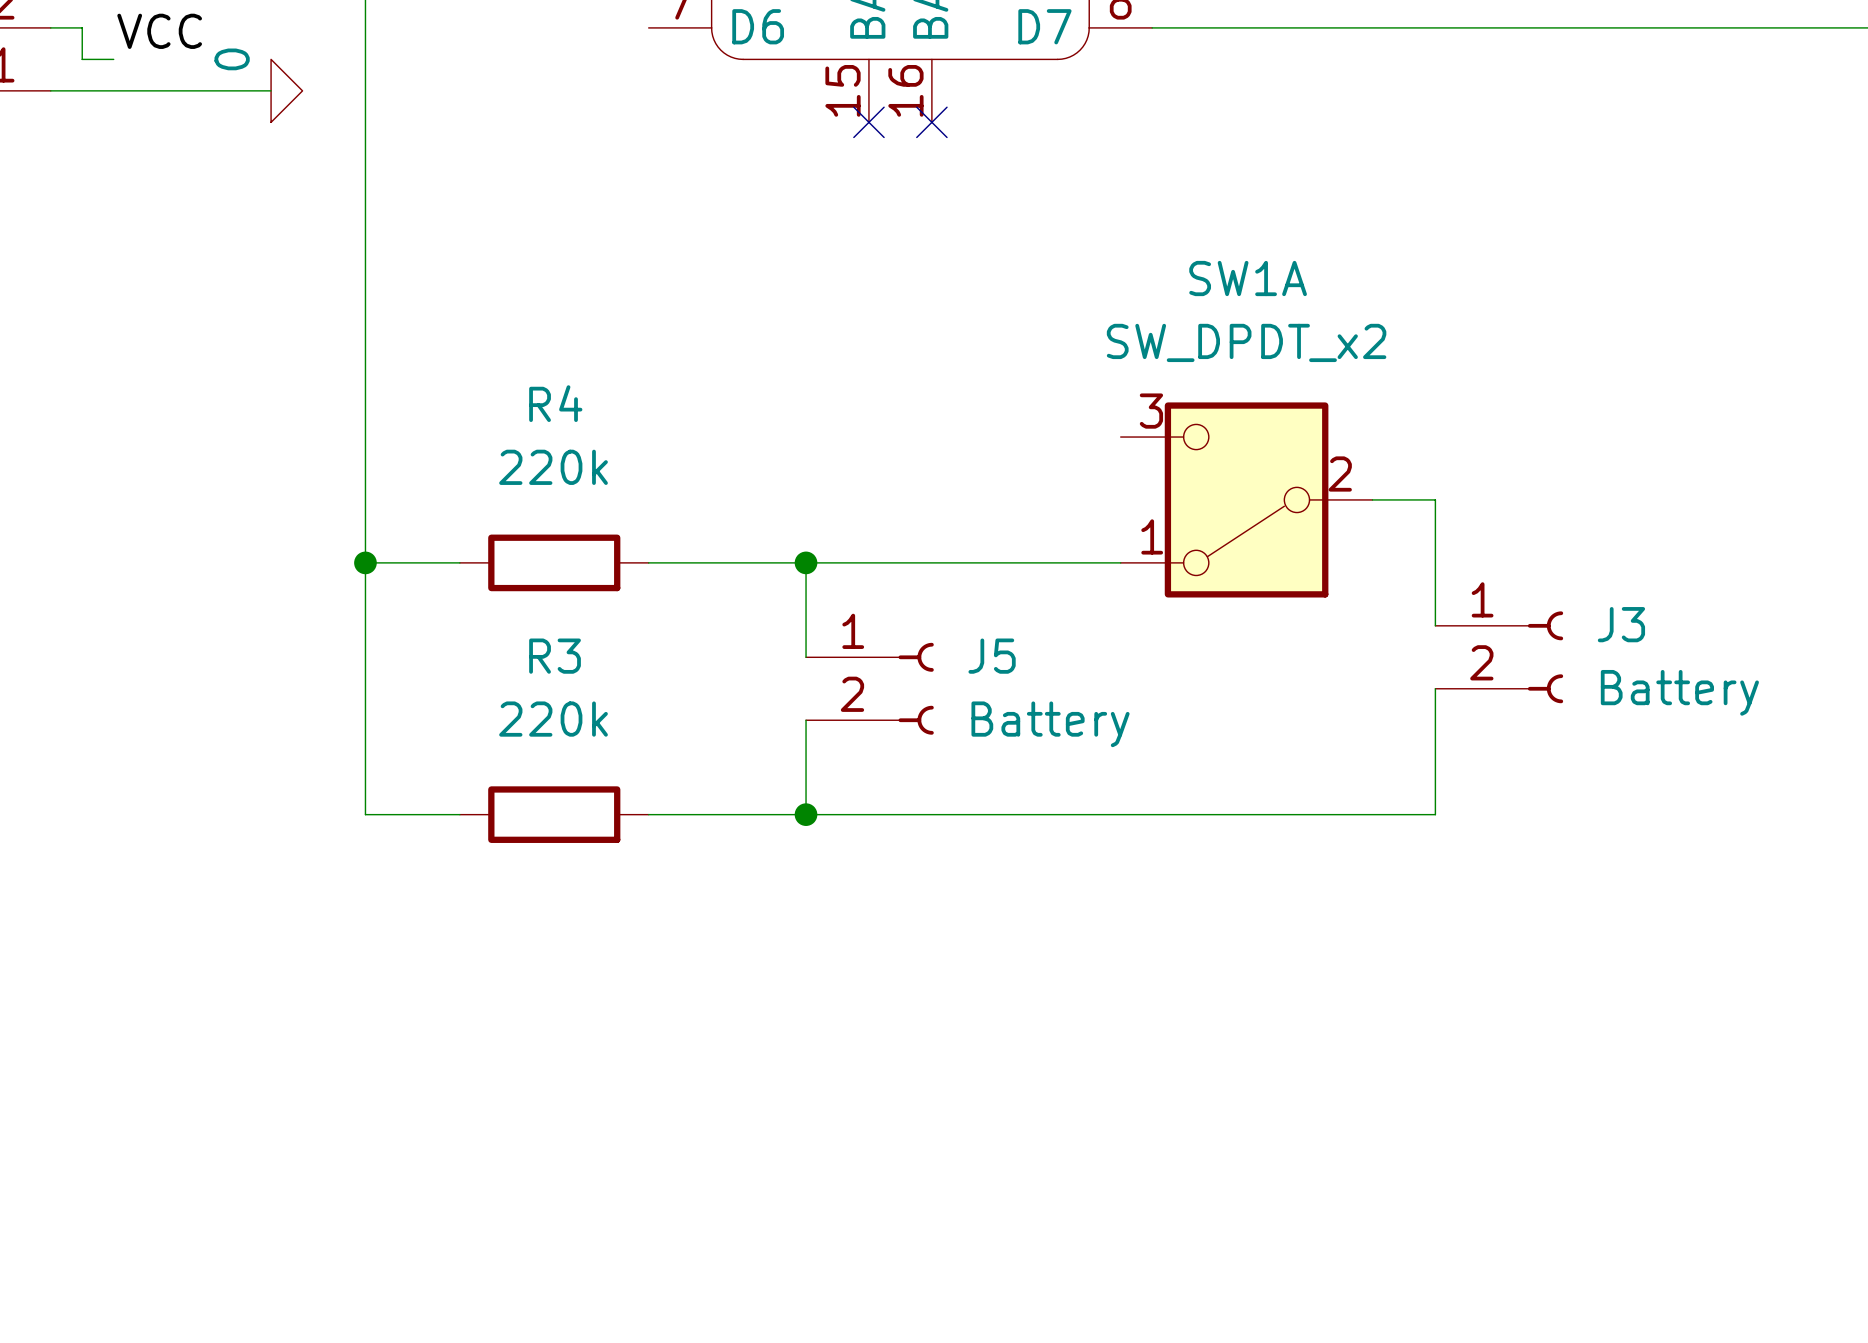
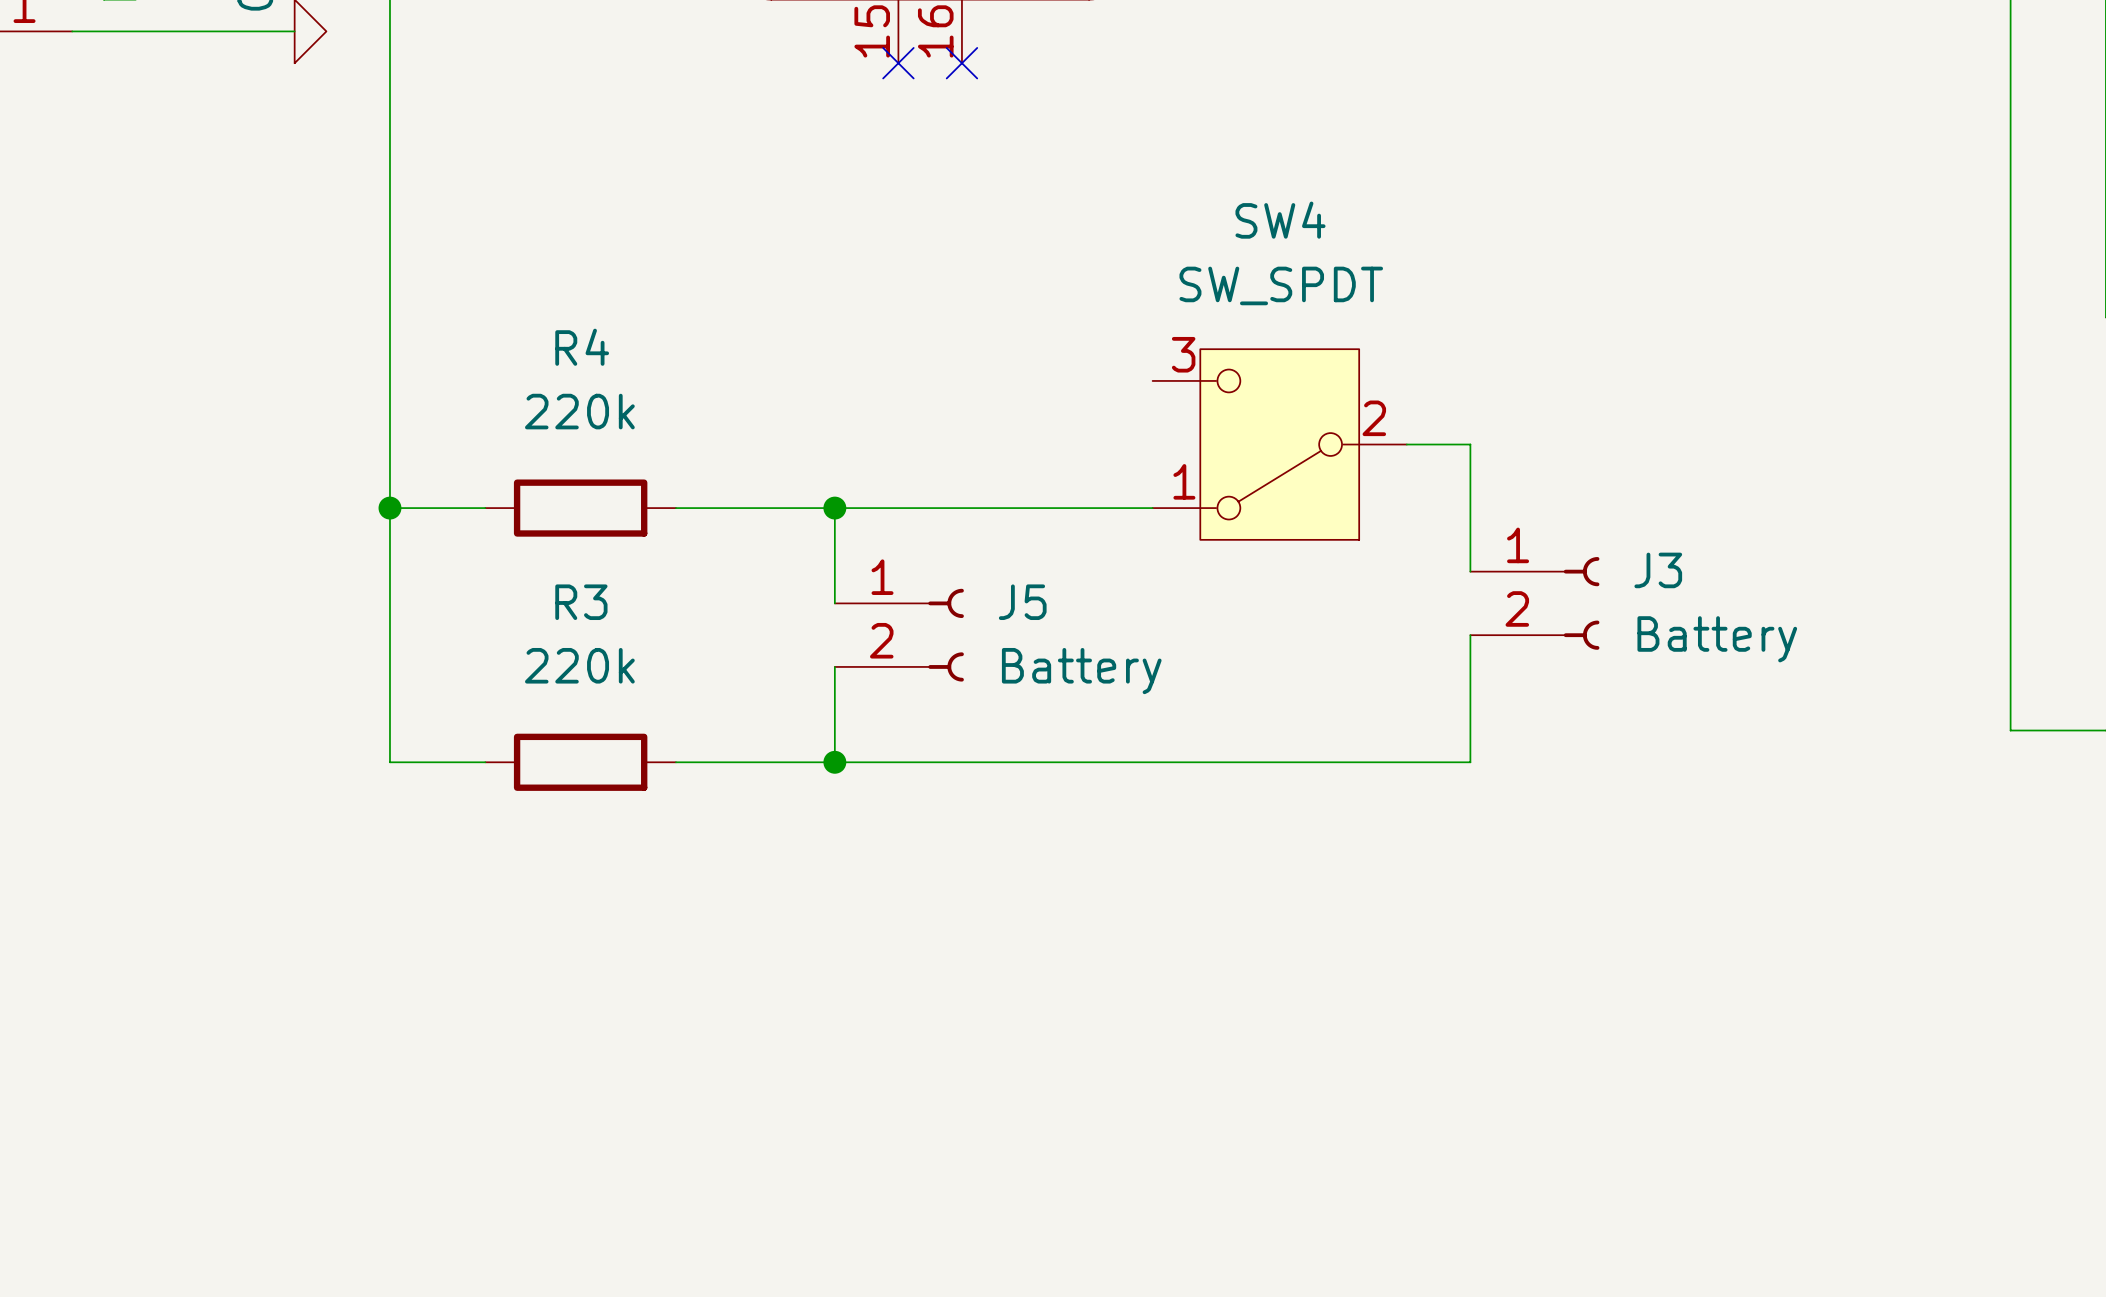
SW1A: SW_DPDT_x2 (1246, 499) -> none
SW4: none -> SW_SPDT (1279, 444)

